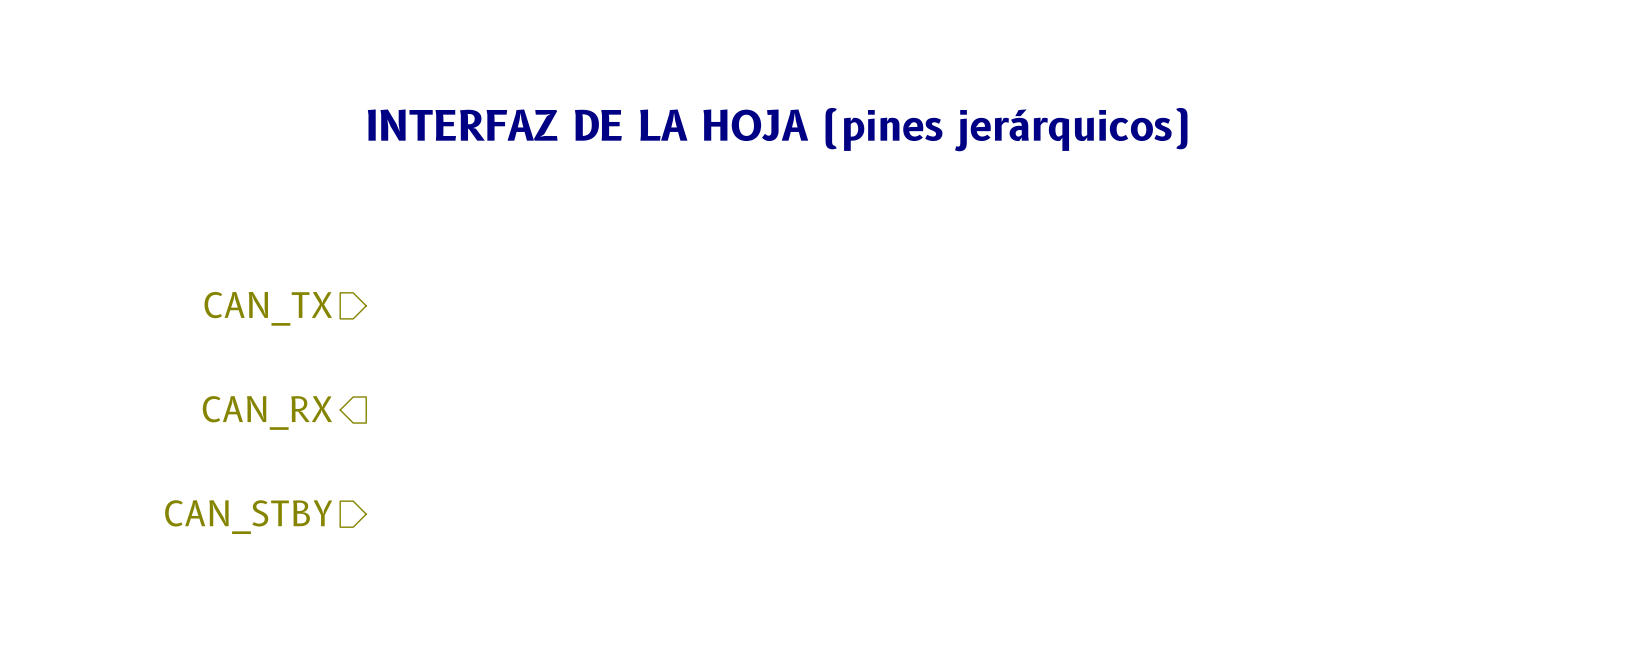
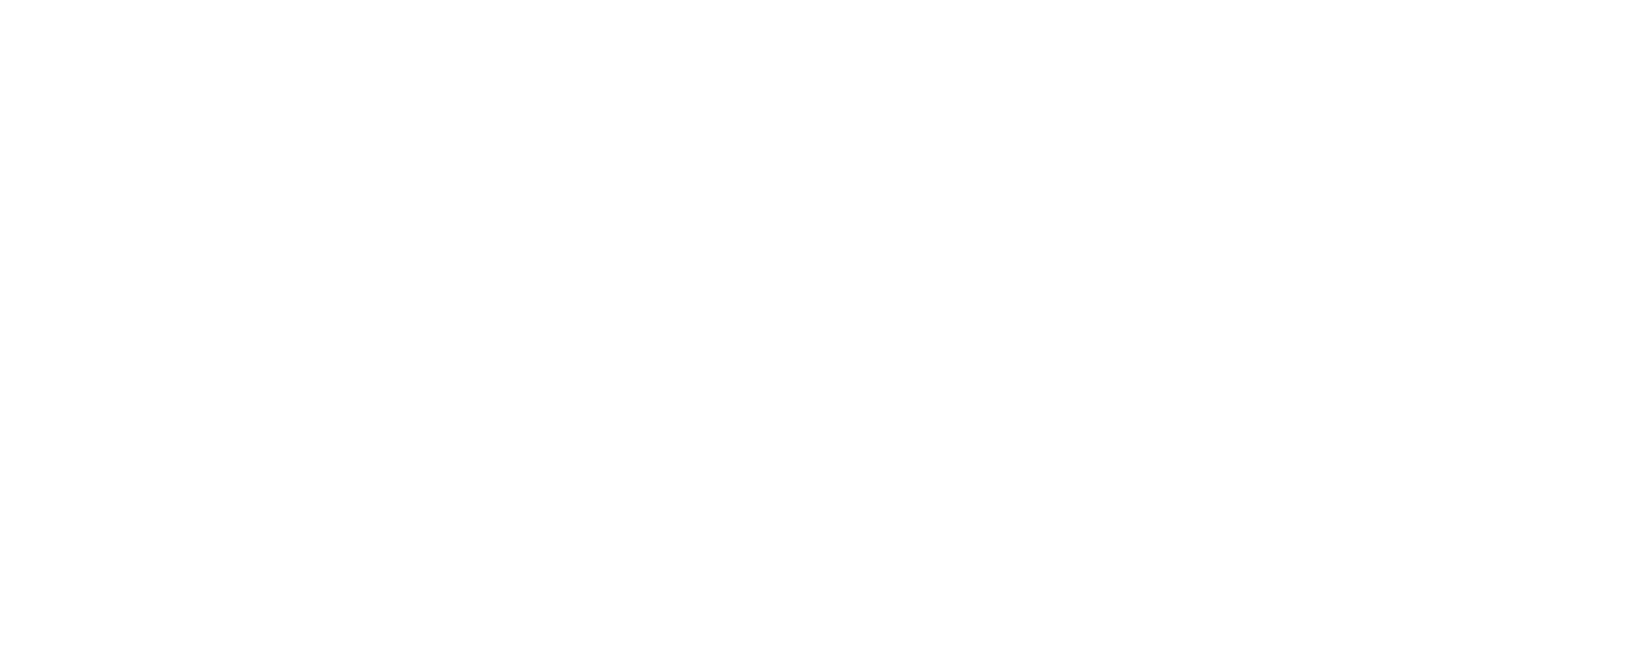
text: INTERFAZ DE LA HOJA (pines jerárquicos) (777, 129) -> none
hierarchical label: CAN_TX (268, 308) -> none
hierarchical label: CAN_RX (267, 412) -> none
hierarchical label: CAN_STBY (248, 517) -> none

